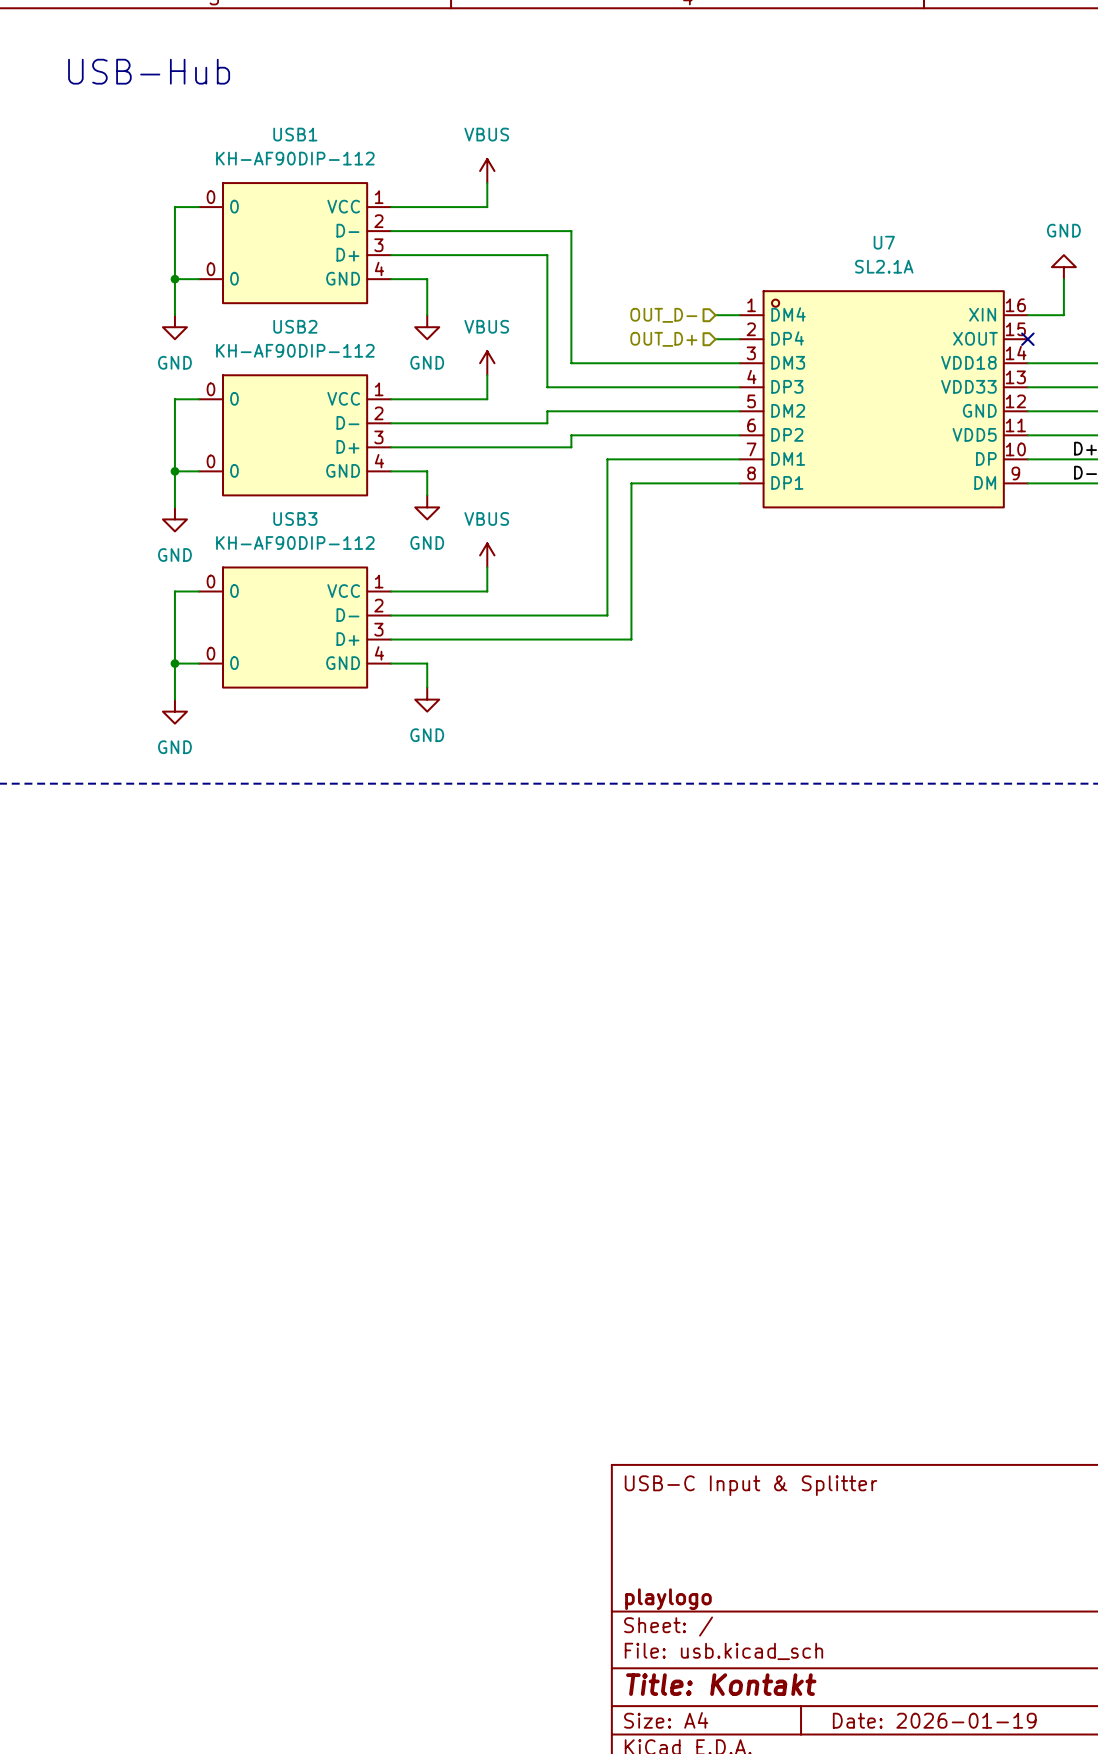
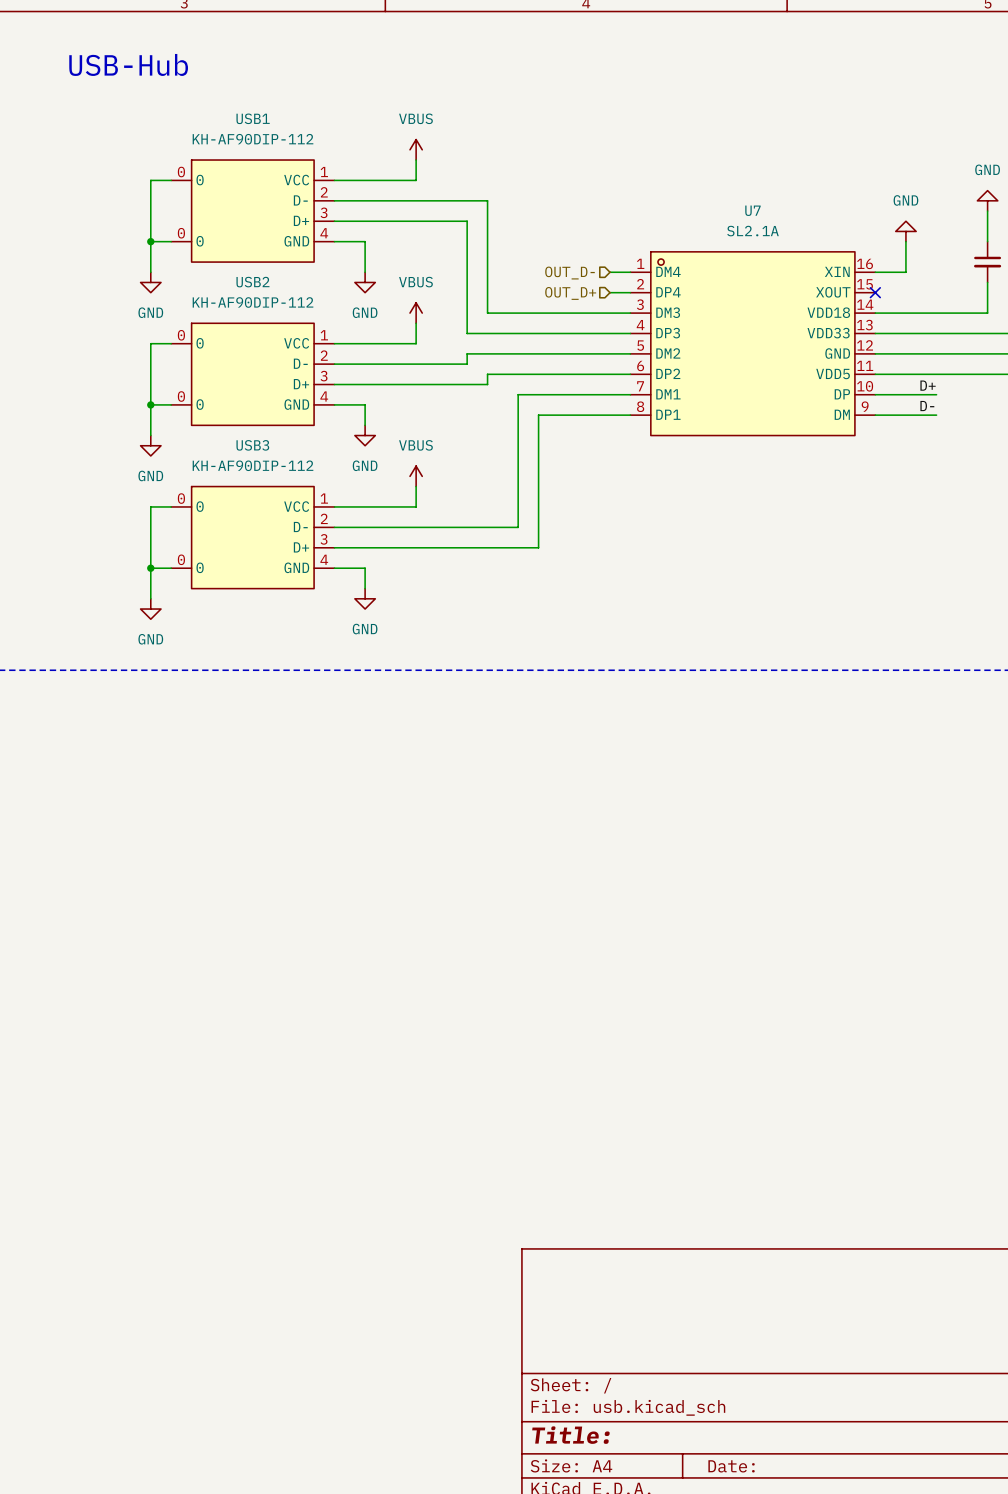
title block: USB-C Input & Splitter (750, 1485) -> none
title block: playlogo (668, 1599) -> none
title block: Title: Kontakt (721, 1684) -> Title: (570, 1435)
title block: Date: 2026-01-19 (934, 1720) -> Date: (731, 1466)

